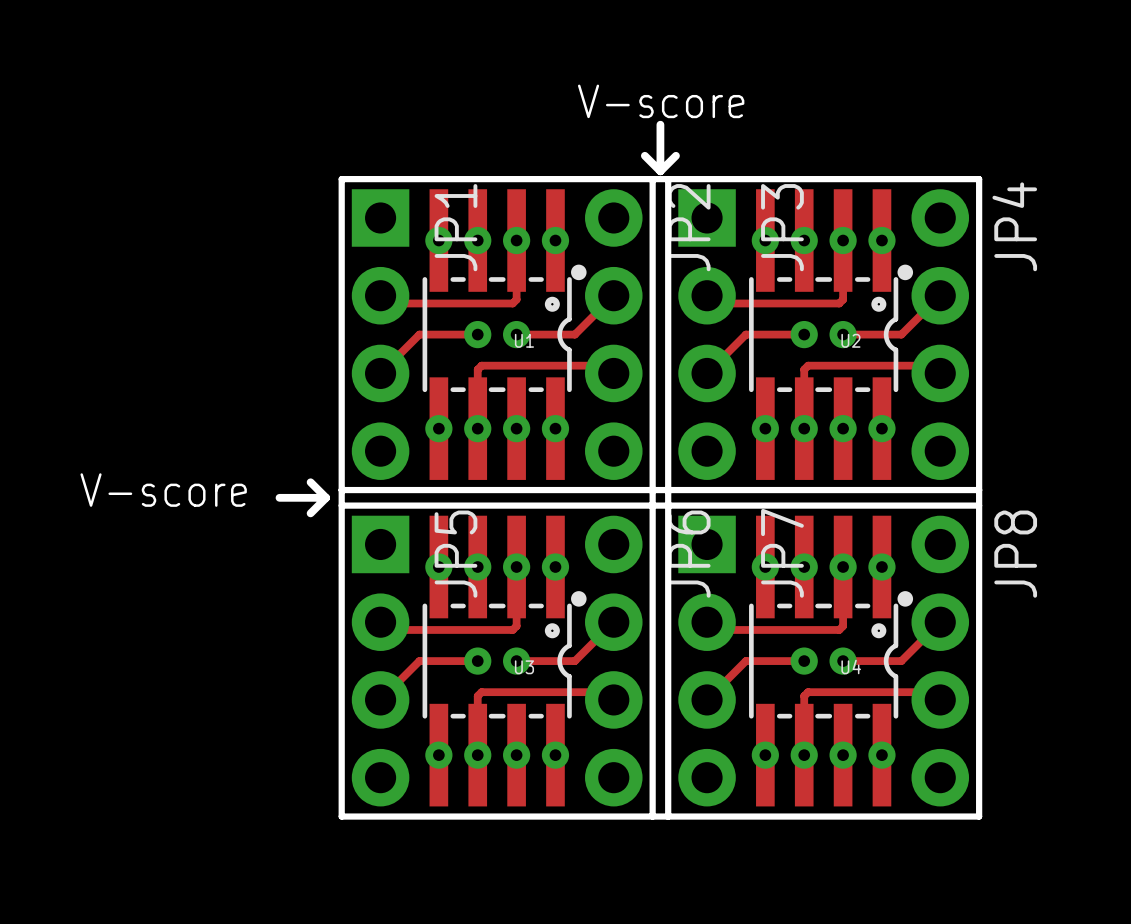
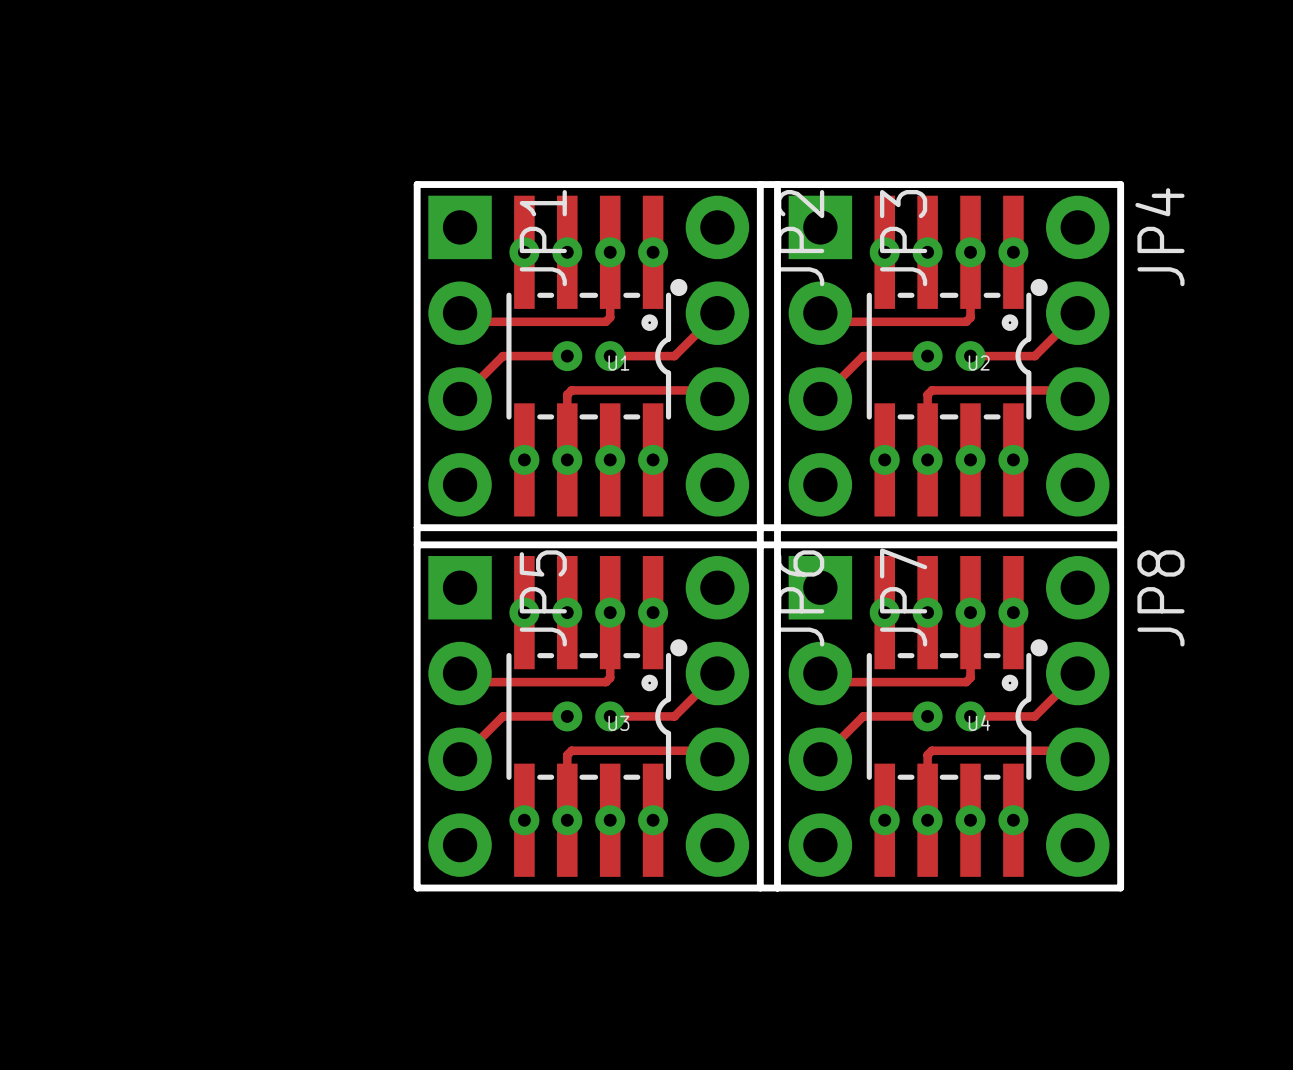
text: V-score (661, 101) -> none
board edge: (660, 124) (660, 163) -> none
board edge: (644, 155) (660, 171) (675, 155) -> none
board edge: (310, 482) (326, 497) (310, 513) -> none
text: V-score (163, 490) -> none
board edge: (279, 497) (318, 497) -> none

